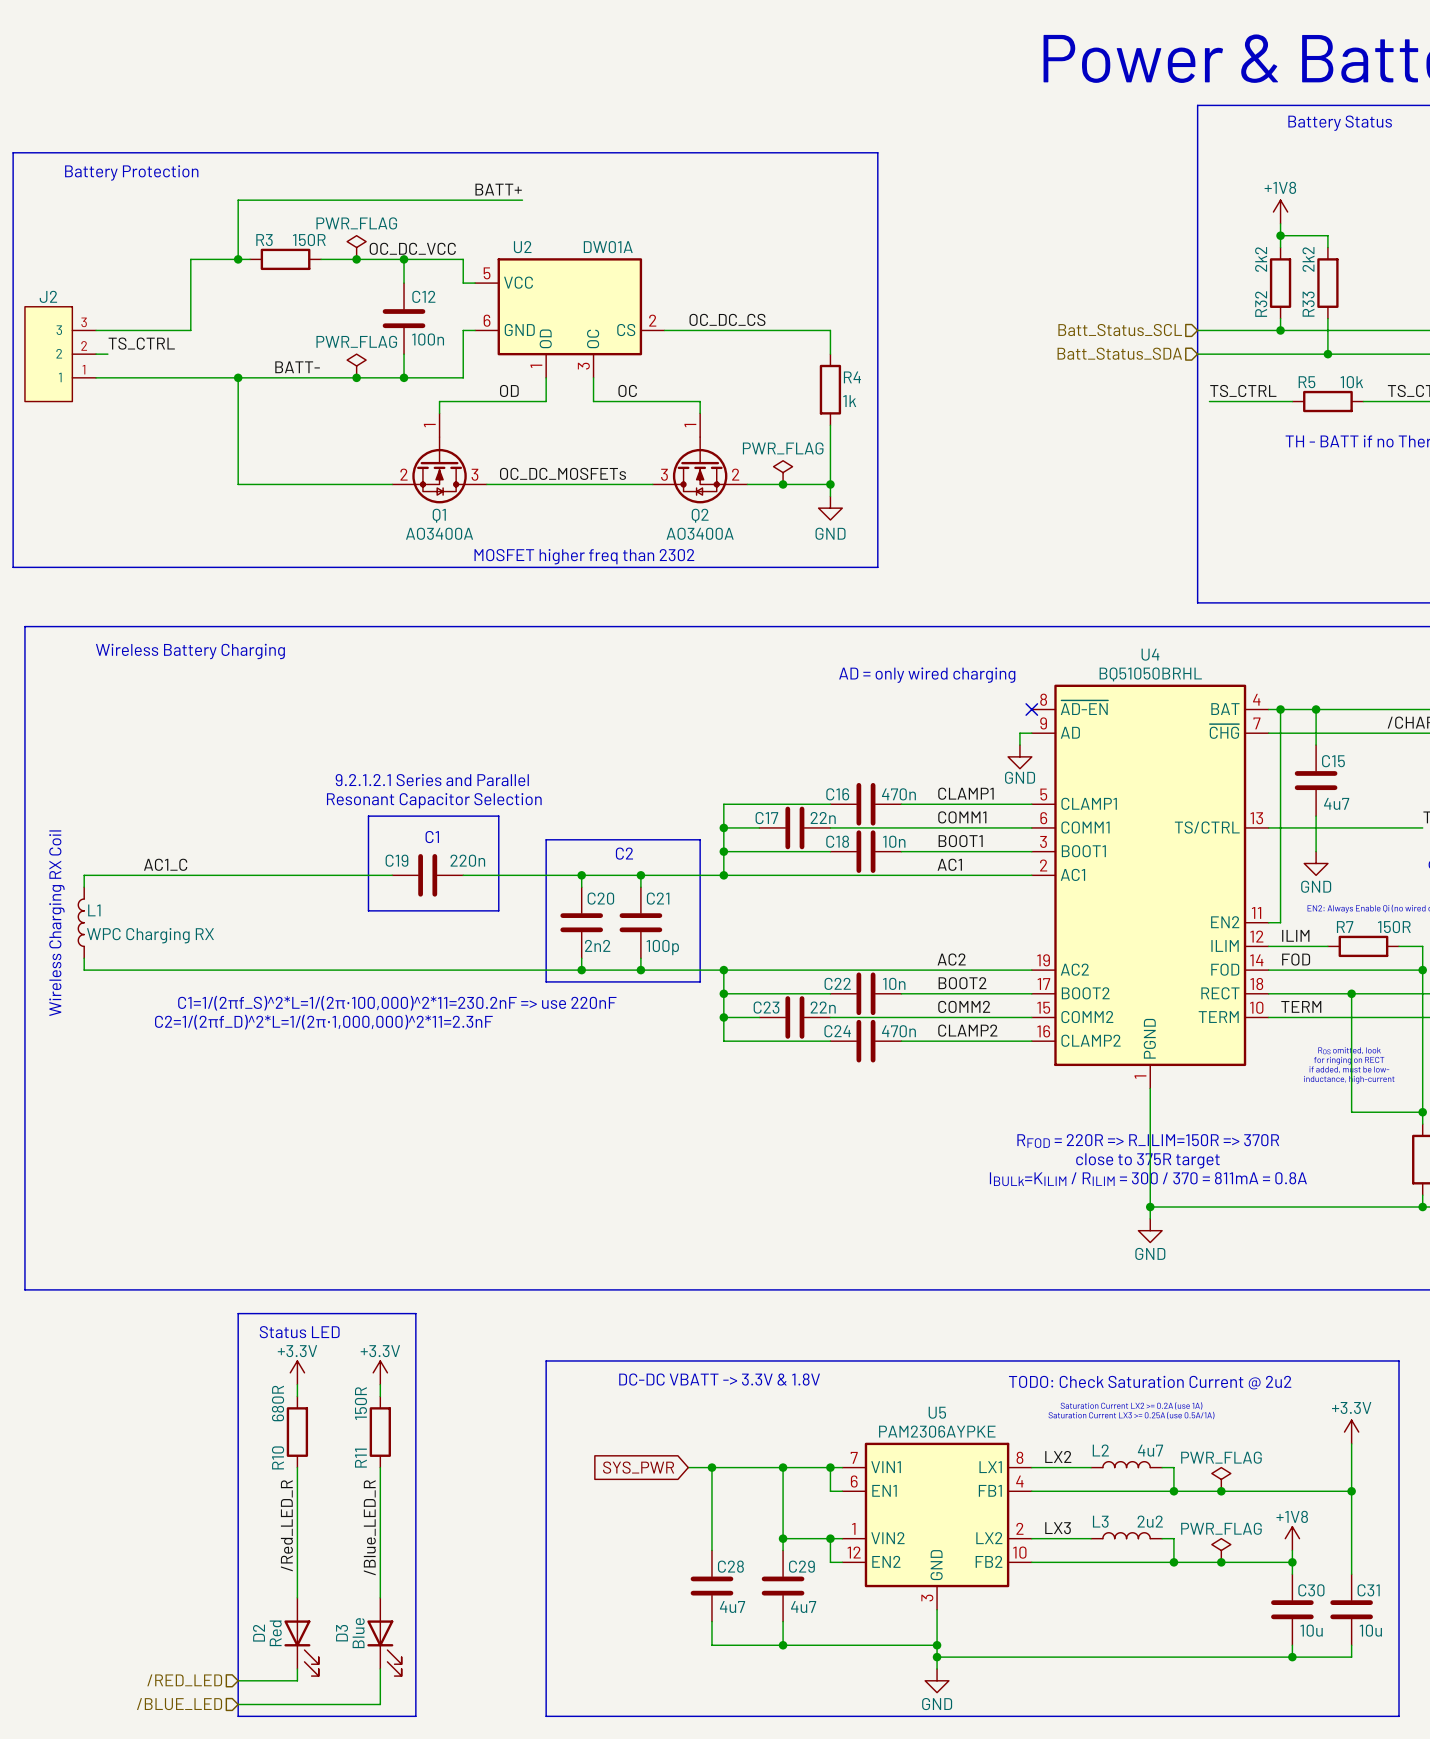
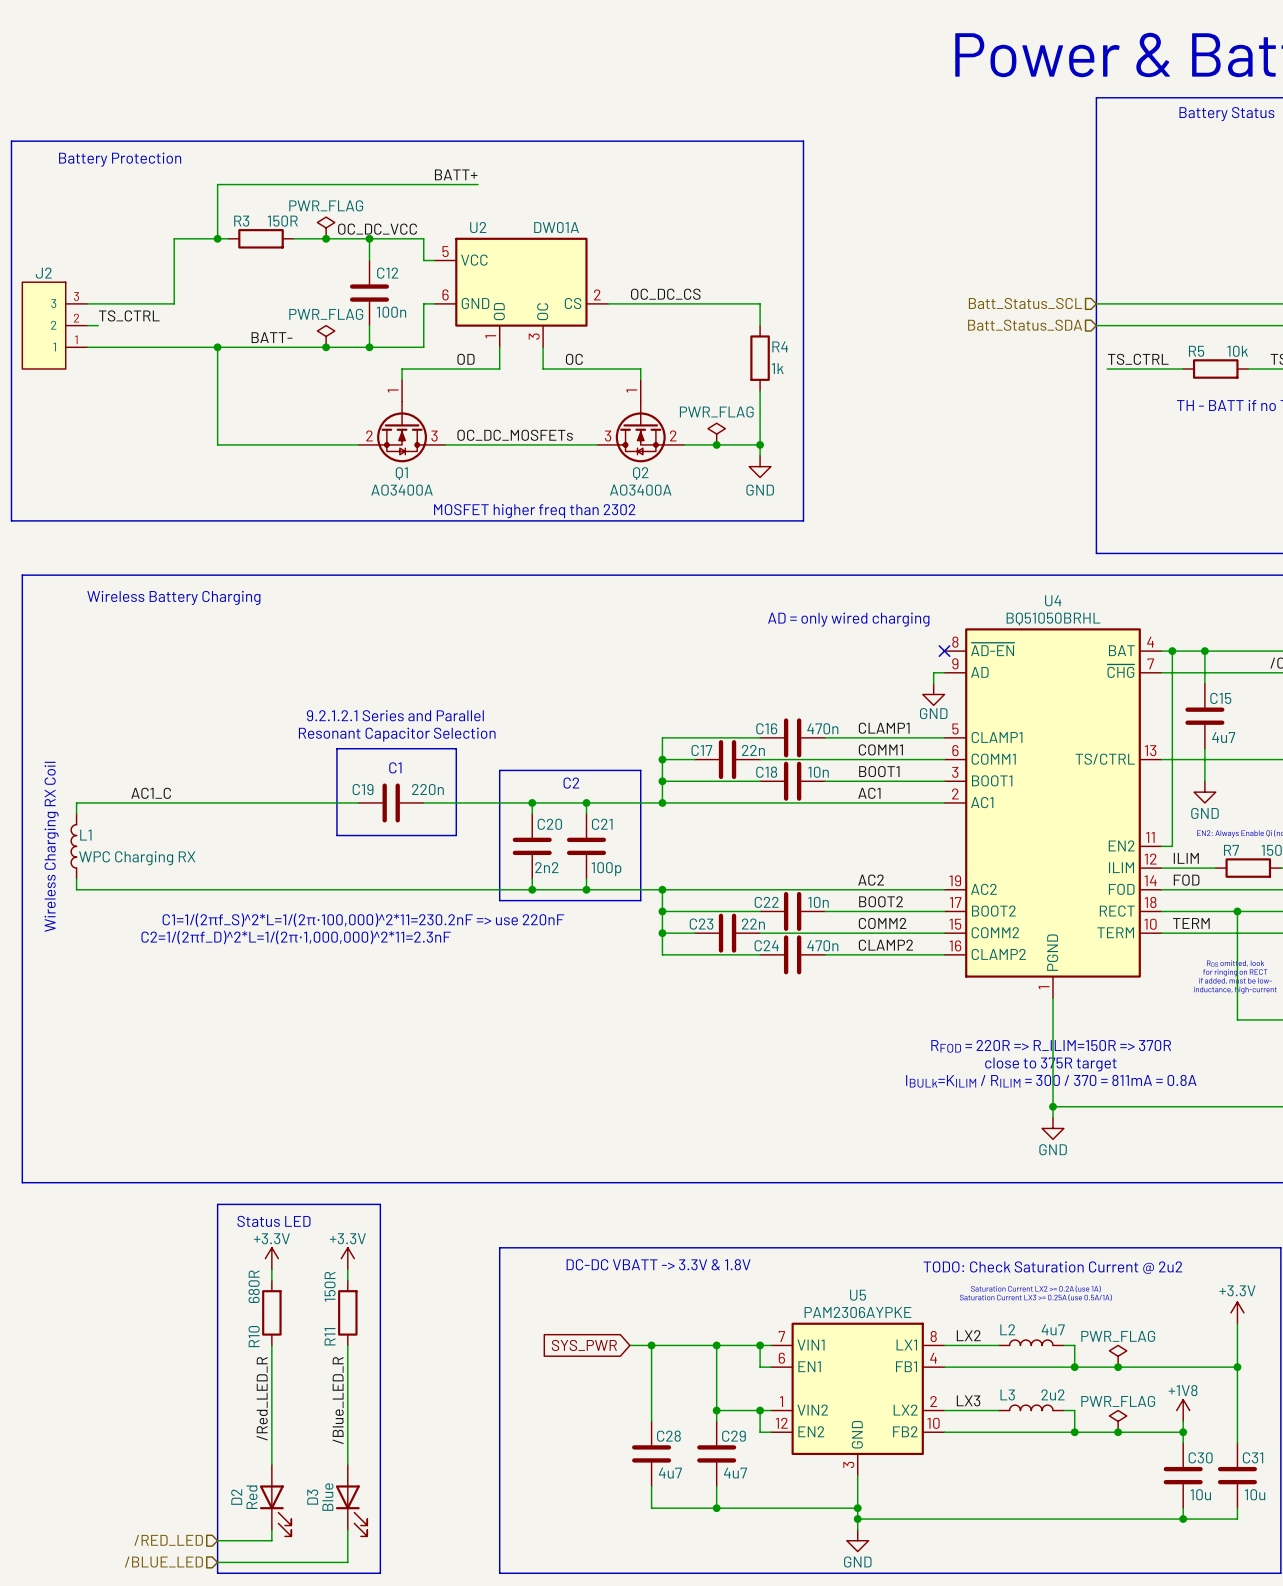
power symbol: +1V8 (1280, 212) -> none
wire: (1280, 223) (1280, 247) -> none
wire: (1280, 235) (1327, 235) (1327, 247) -> none
junction: (1280, 235) -> none
R32: 2k2 (1280, 283) -> none
R33: 2k2 (1327, 283) -> none
wire: (1280, 318) (1280, 330) -> none
wire: (1327, 318) (1327, 354) -> none
junction: (1280, 330) -> none
junction: (1327, 354) -> none

